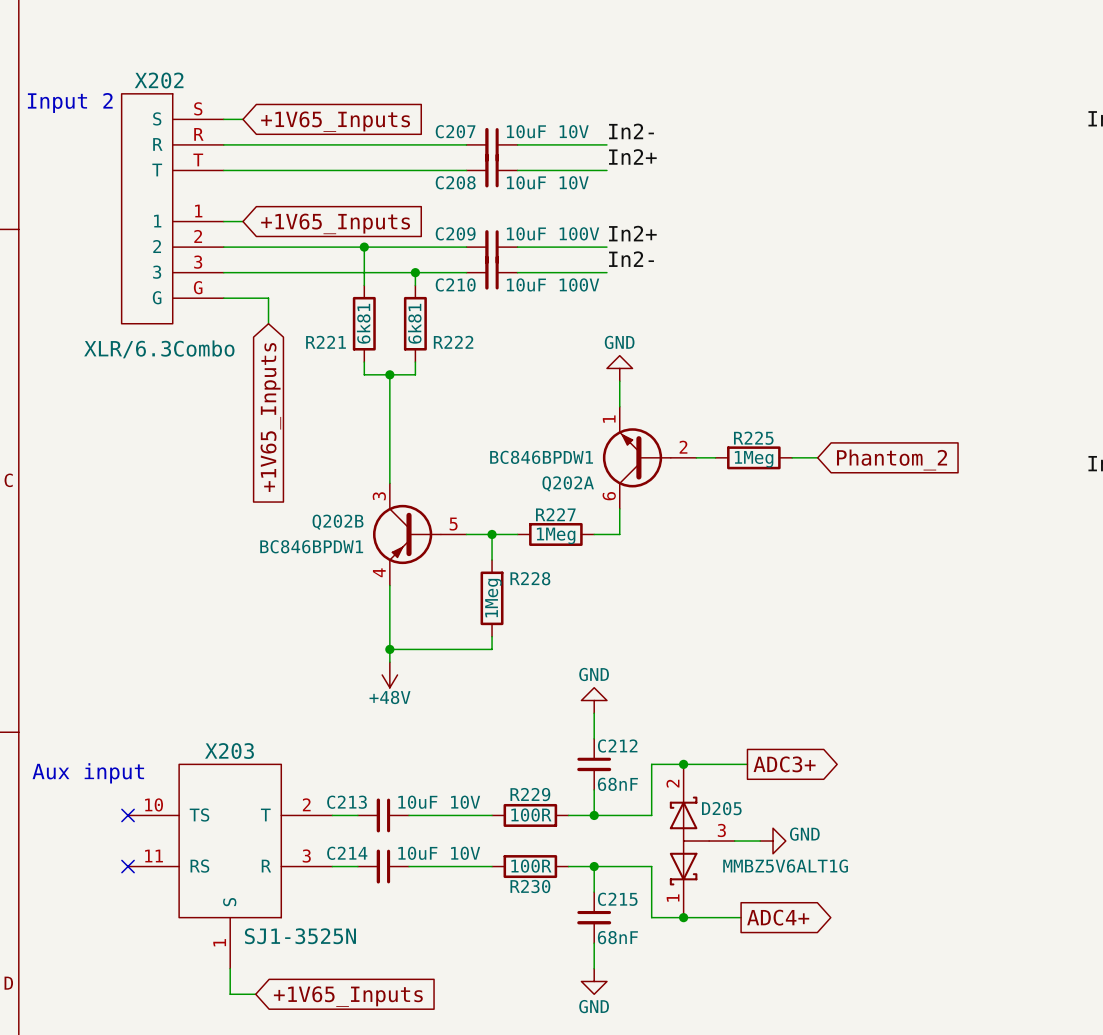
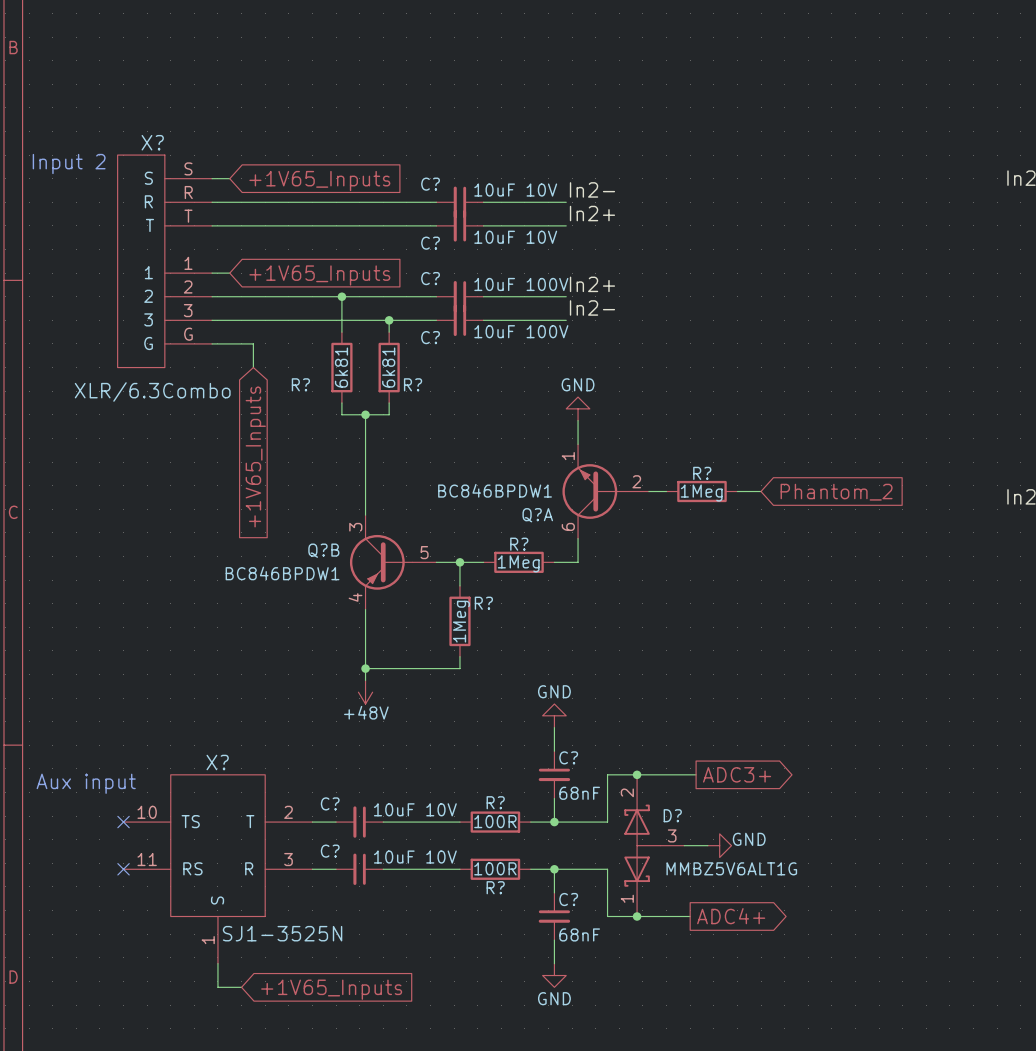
X202 name: X202 (159, 80) -> X? (152, 142)
C207 name: C207 (455, 131) -> C? (430, 184)
C208 name: C208 (455, 182) -> C? (430, 243)
C209 name: C209 (455, 233) -> C? (430, 278)
C210 name: C210 (455, 284) -> C? (430, 337)
R221 name: R221 (326, 342) -> R? (300, 384)
R222 name: R222 (453, 342) -> R? (413, 384)
R225 name: R225 (753, 438) -> R? (702, 473)
Q202A name: Q202A (568, 483) -> Q?A (537, 515)
R227 name: R227 (555, 514) -> R? (519, 544)
Q202B name: Q202B (338, 522) -> Q?B (323, 550)
R228 name: R228 (530, 578) -> R? (483, 603)
C212 name: C212 (617, 746) -> C? (568, 757)
X203 name: X203 (229, 751) -> X? (217, 762)
R229 name: R229 (530, 794) -> R? (495, 802)
C213 name: C213 (347, 802) -> C? (330, 803)
D205 name: D205 (721, 808) -> D? (672, 815)
C214 name: C214 (347, 853) -> C? (330, 851)
R230 name: R230 (530, 886) -> R? (495, 887)
C215 name: C215 (617, 899) -> C? (568, 899)

